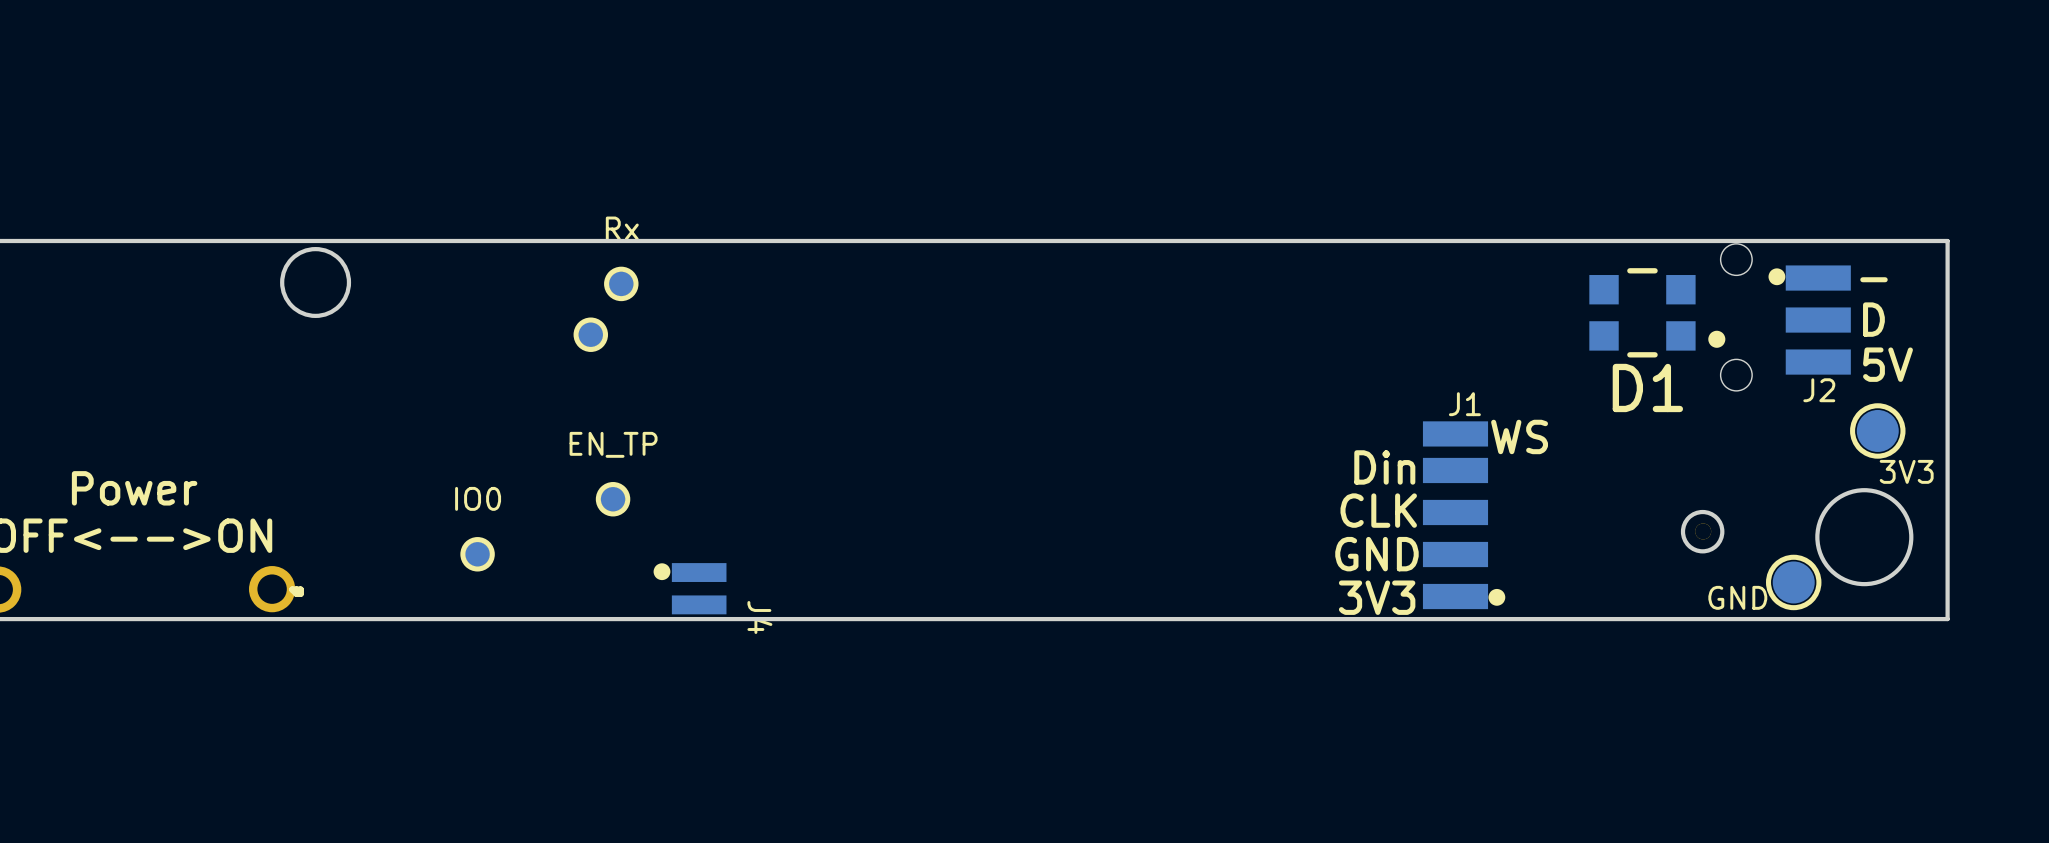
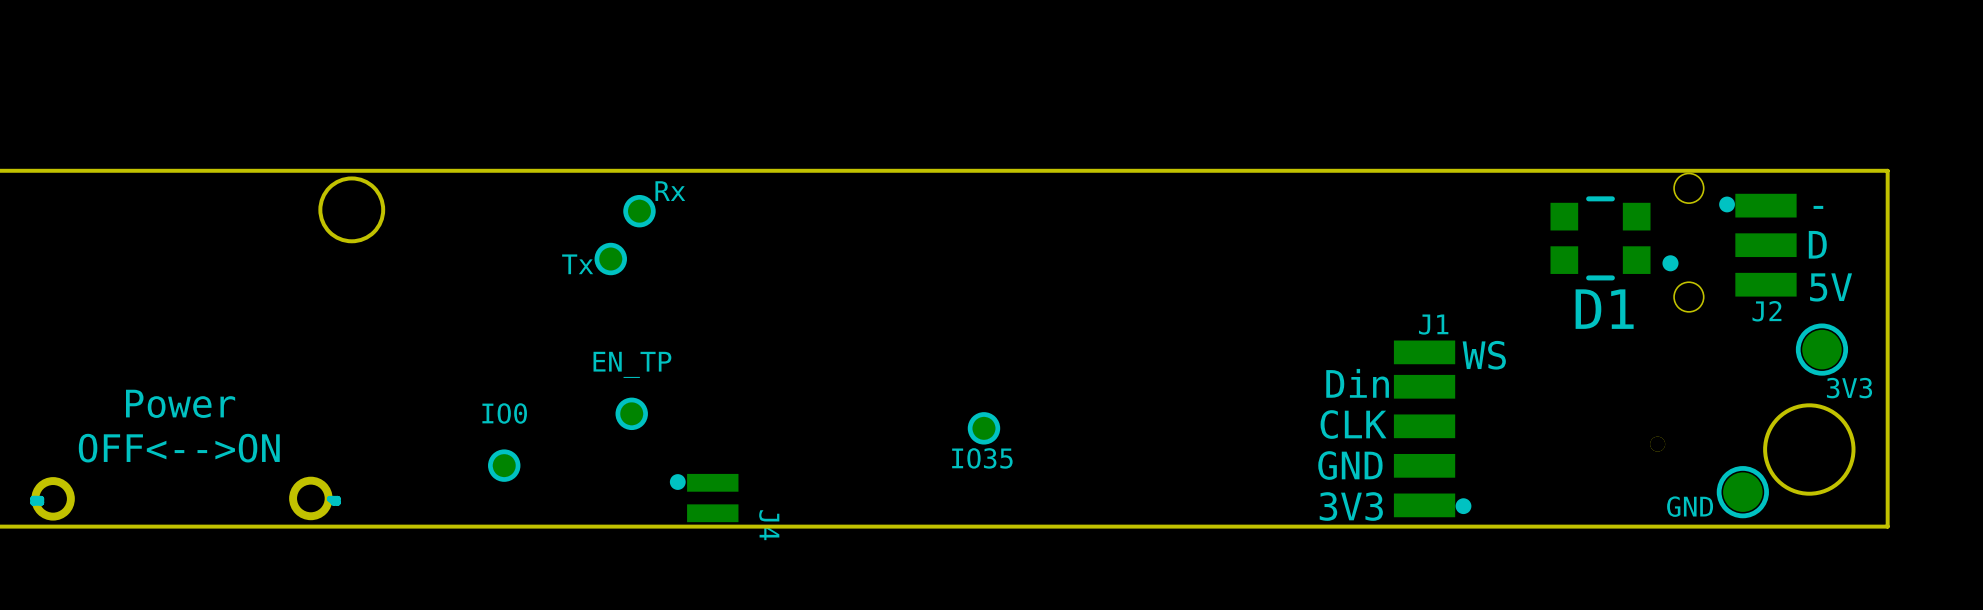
part value position: Rx (622, 228) -> Rx (670, 191)
part value: none -> Tx (577, 264)
round board edge: [1680, 509, 1725, 554] -> none
part: none -> IO35 (983, 428)

